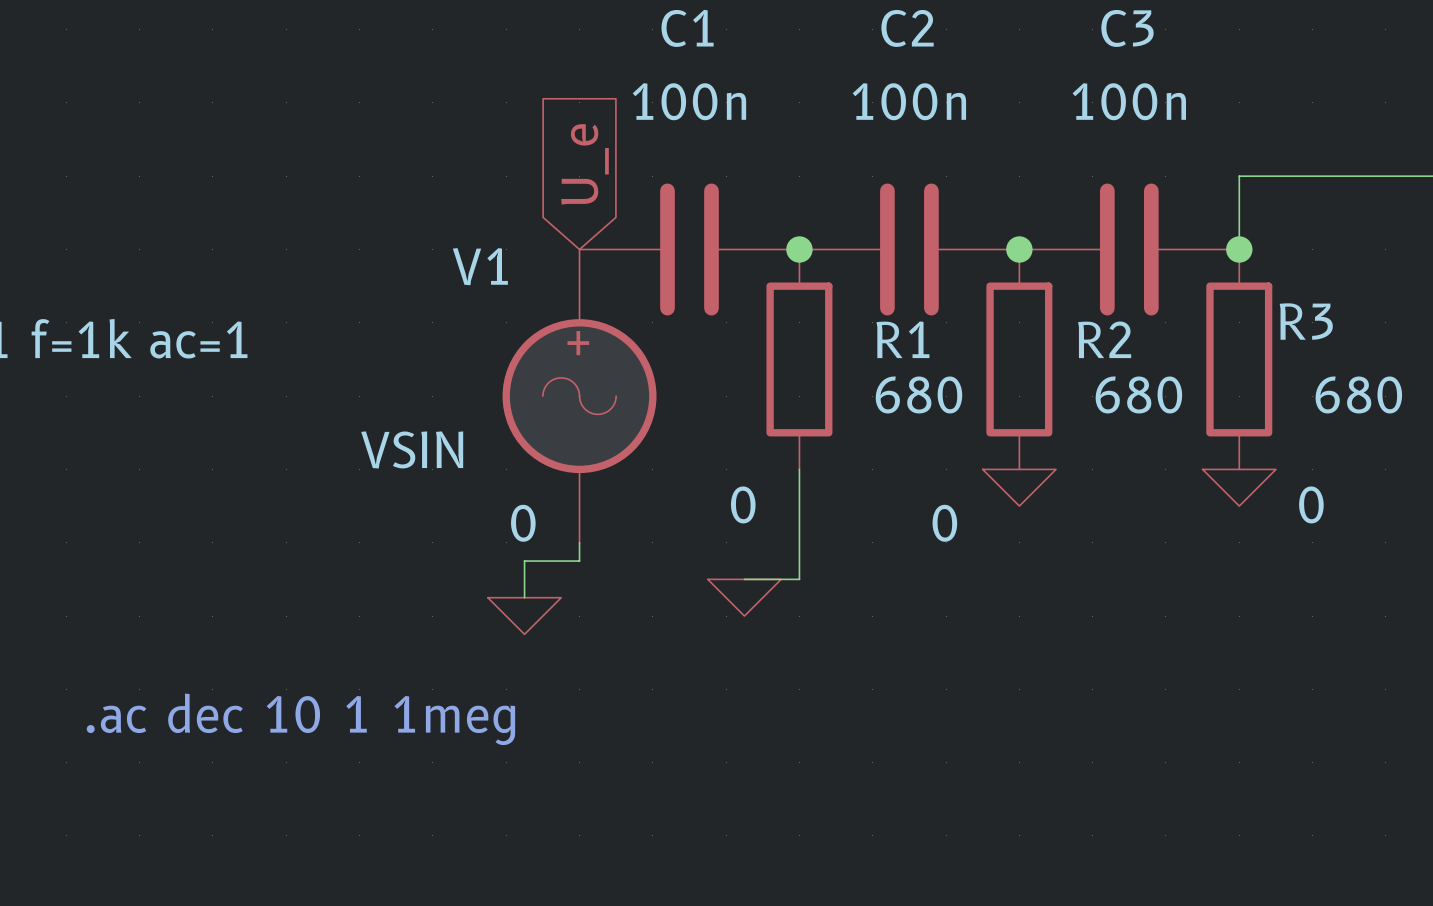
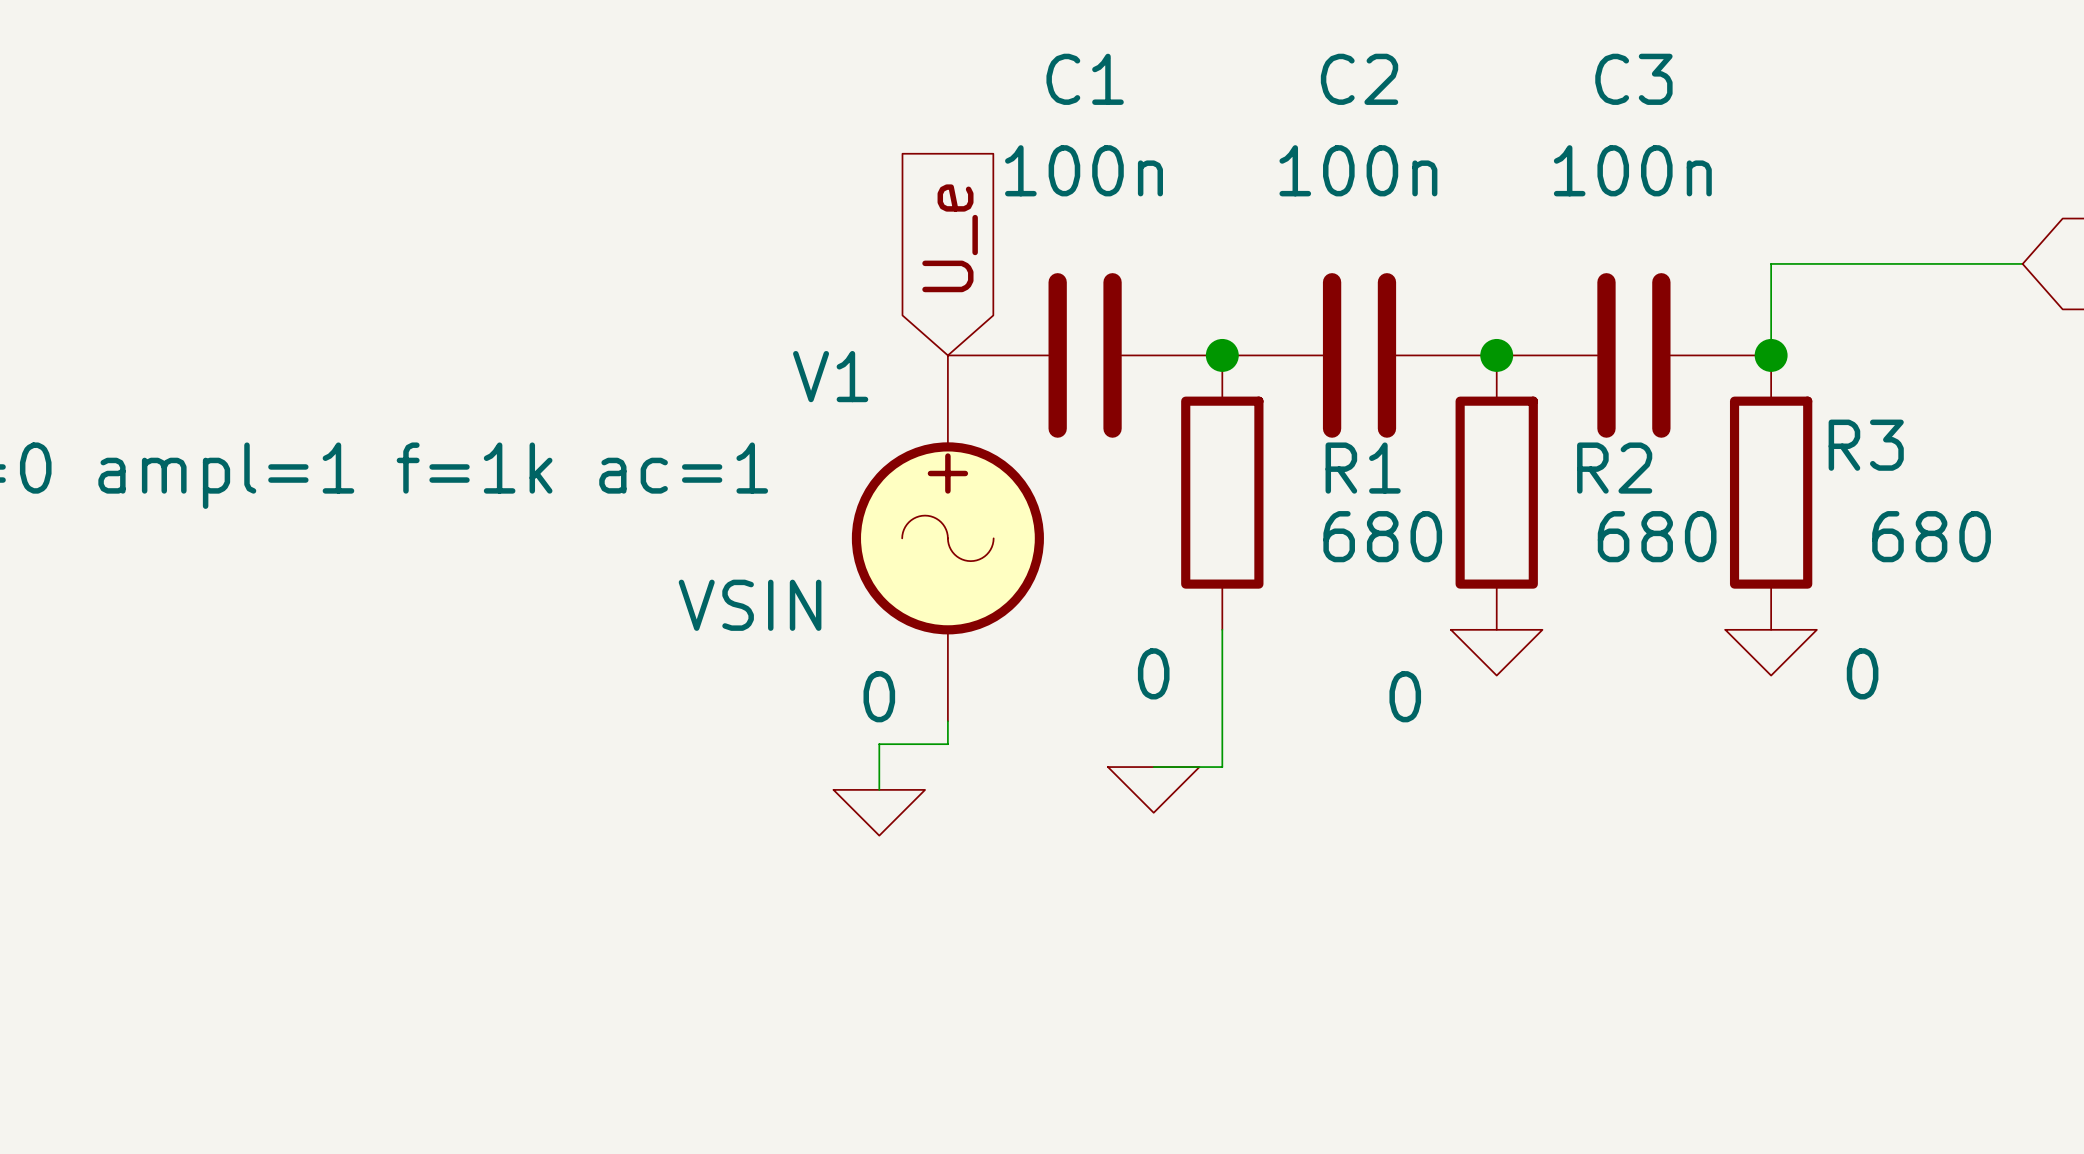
text: .ac dec 10 1 1meg (300, 719) -> none

